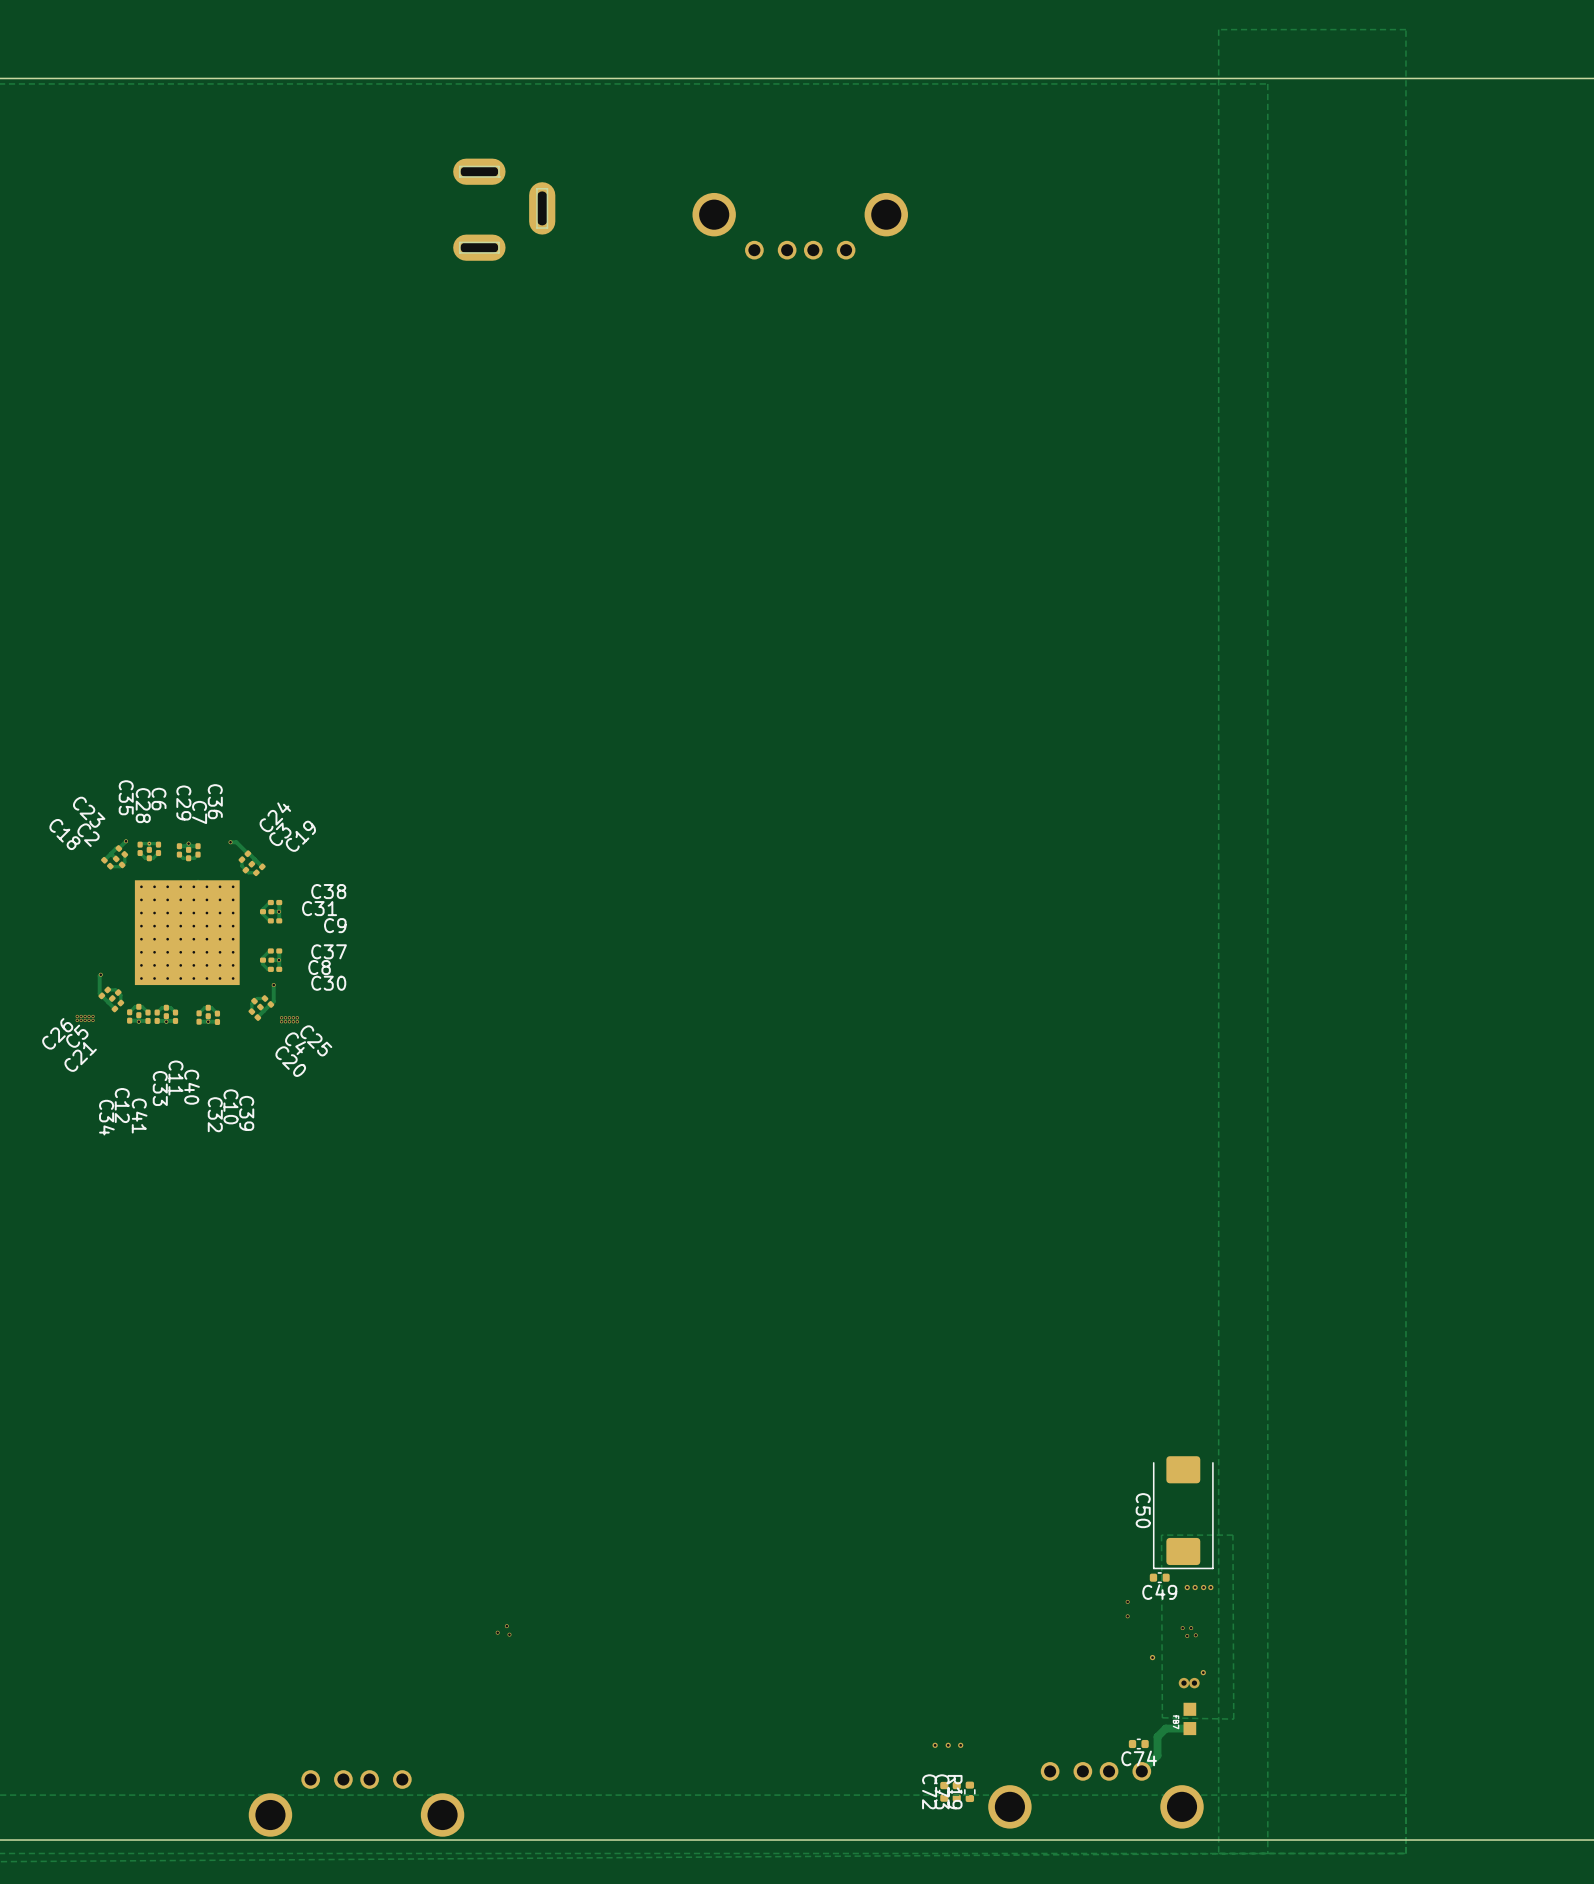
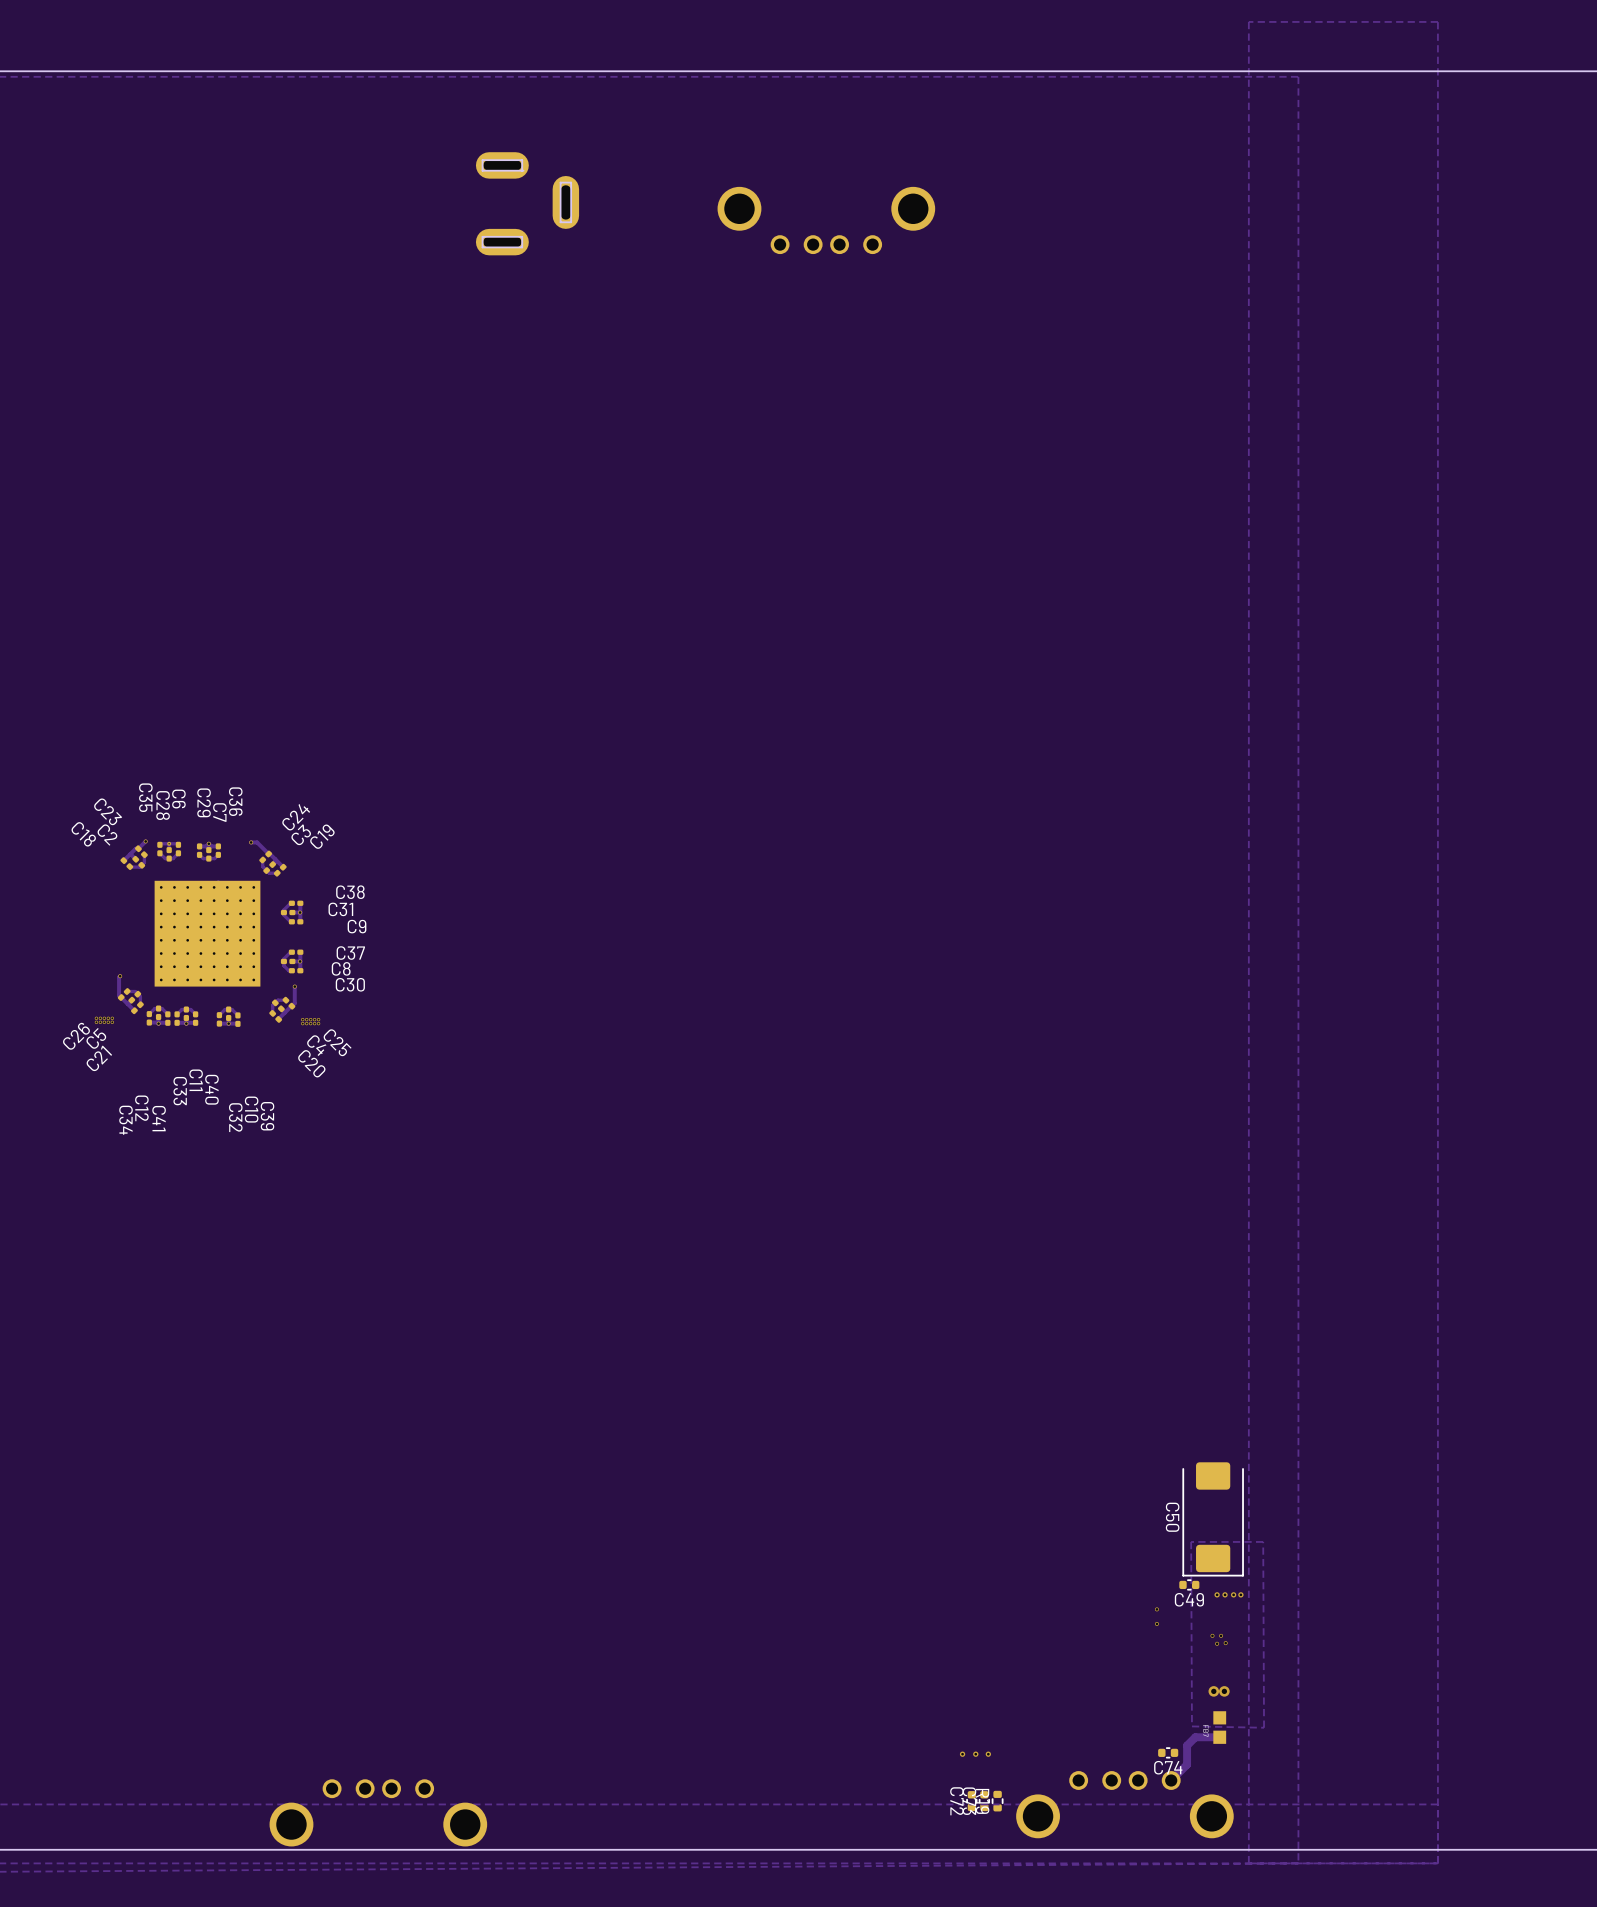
via: (506, 1626) -> none
via: (497, 1632) -> none
via: (509, 1634) -> none
via: (1152, 1657) -> none
via: (1203, 1672) -> none

